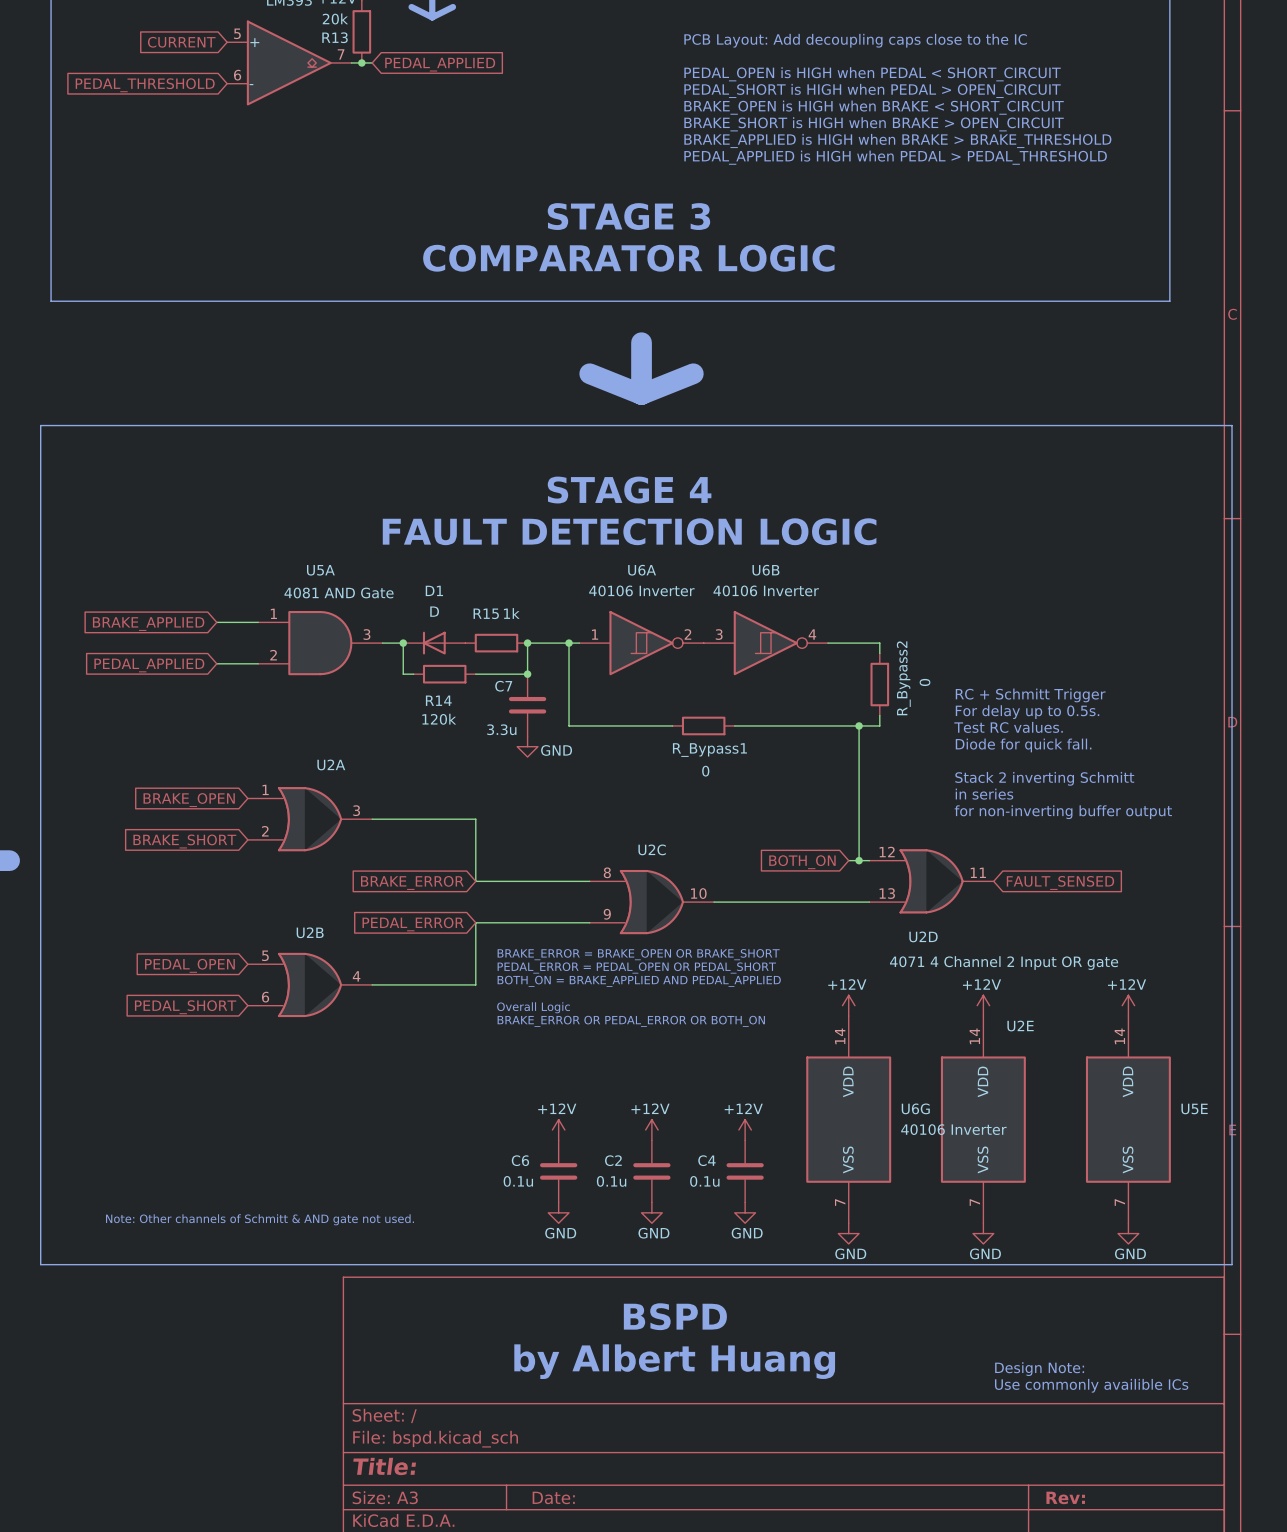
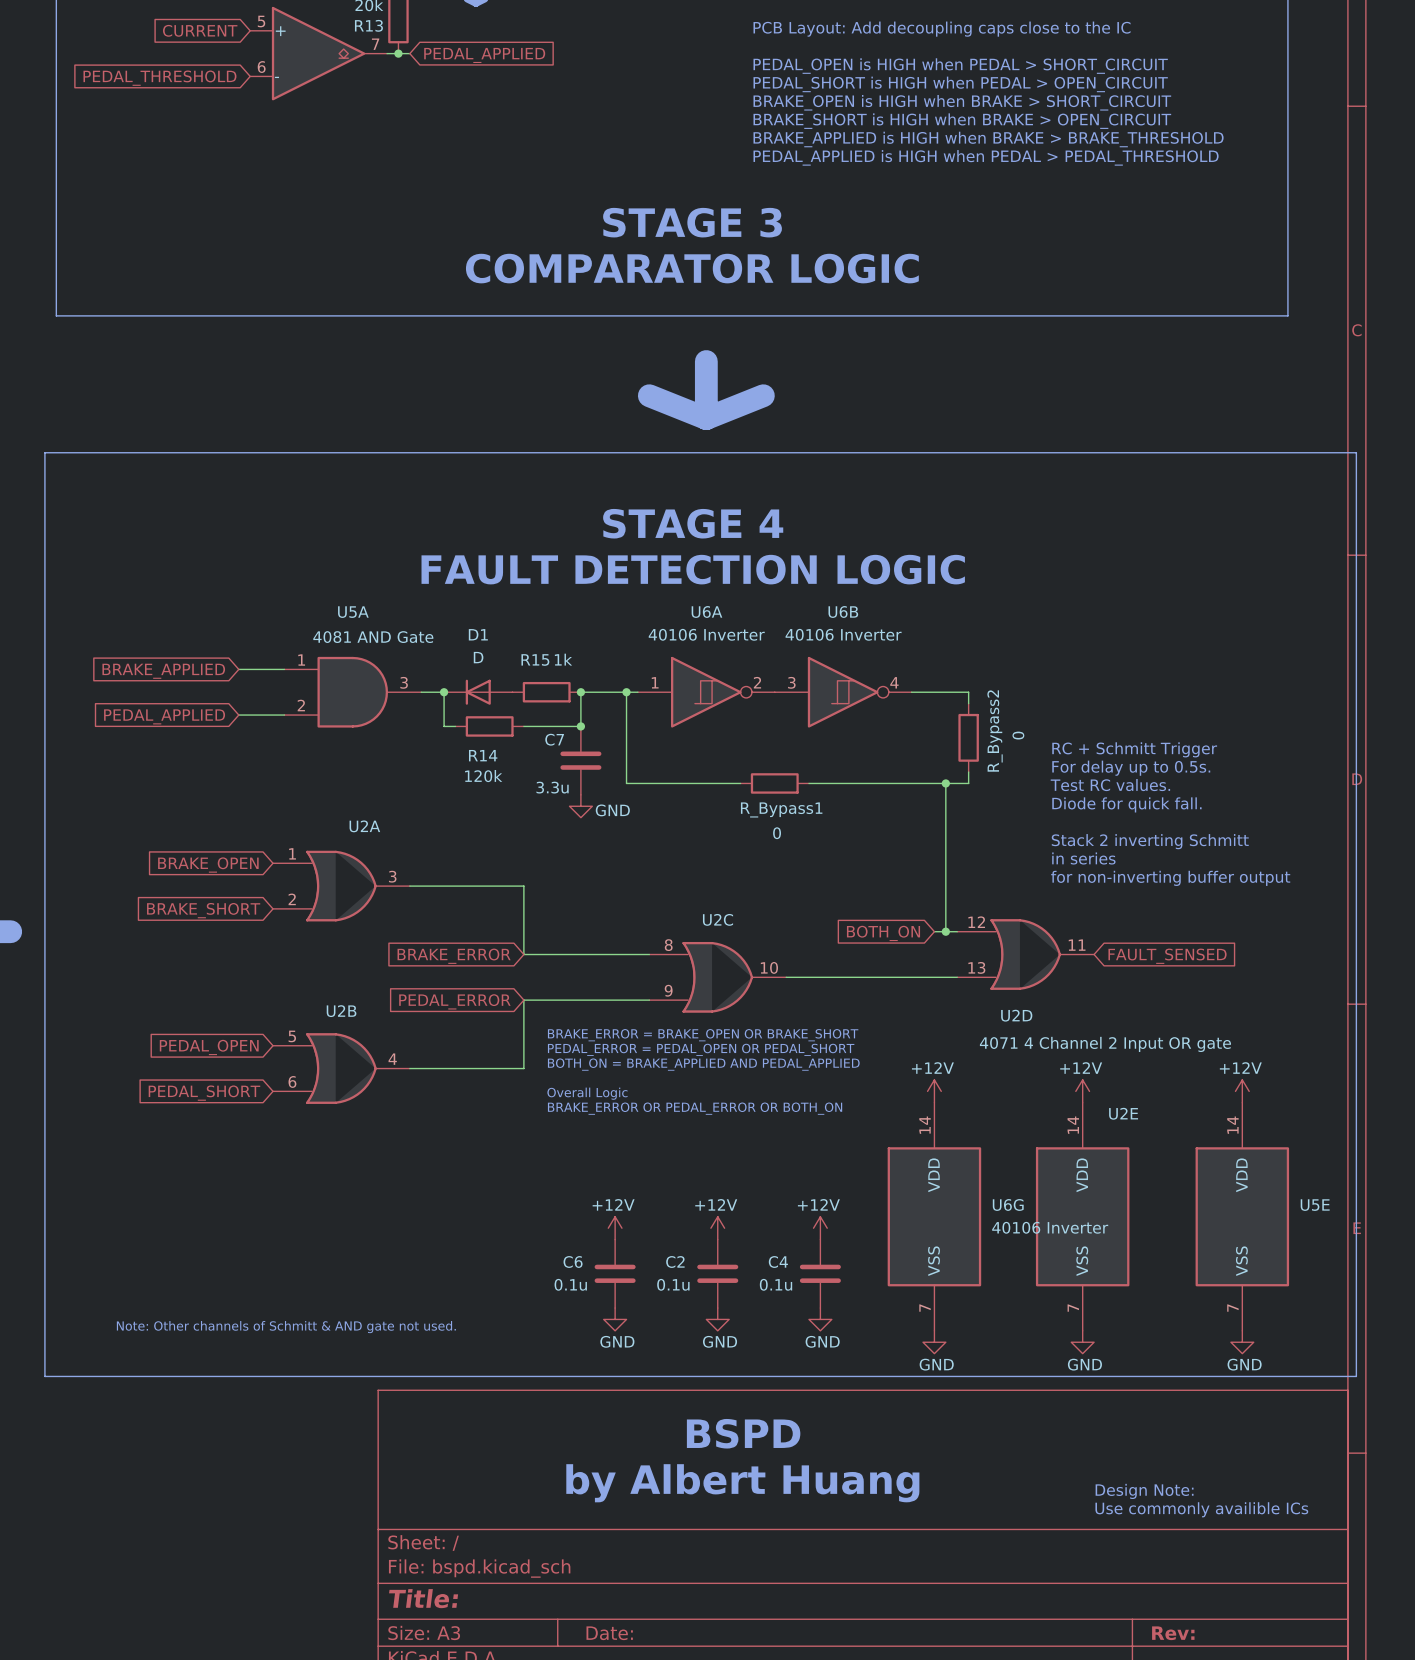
text: PEDAL_OPEN is HIGH when PEDAL < SHORT_CIRCUIT (872, 74) -> PEDAL_OPEN is HIGH when PEDAL > SHORT_CIRCUIT (960, 66)
text: BRAKE_OPEN is HIGH when BRAKE < SHORT_CIRCUIT (874, 107) -> BRAKE_OPEN is HIGH when BRAKE > SHORT_CIRCUIT (962, 102)

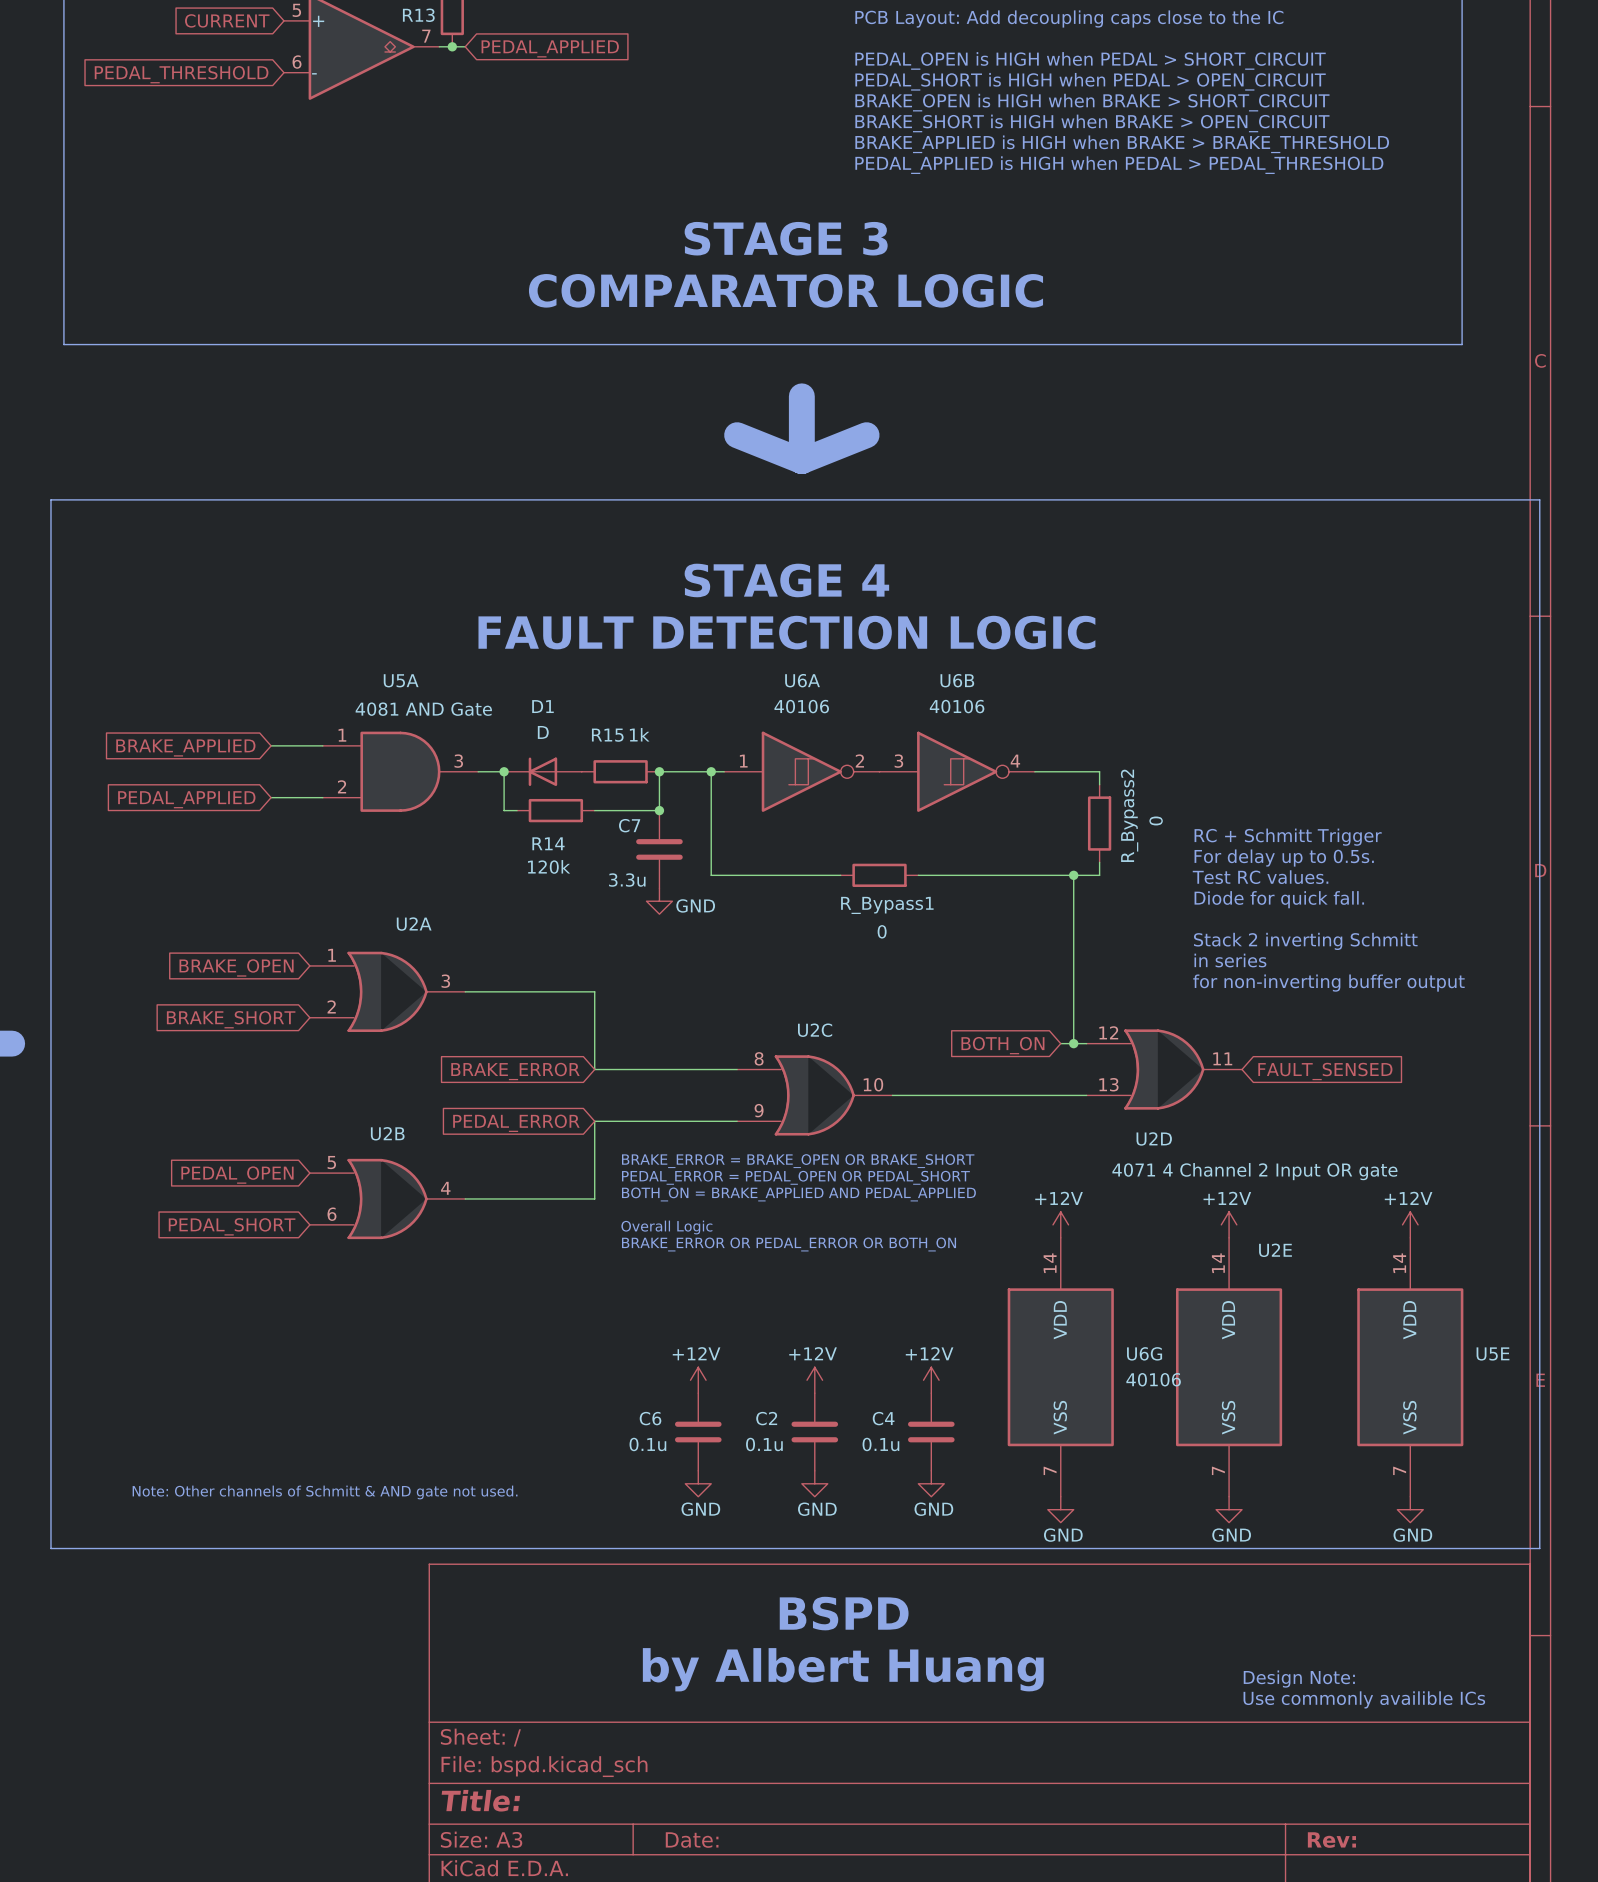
U6A value: 40106 Inverter (706, 634) -> 40106 (801, 706)
U6B value: 40106 Inverter (843, 634) -> 40106 (957, 706)
U6G value: 40106 Inverter (1050, 1227) -> 40106 (1153, 1379)

